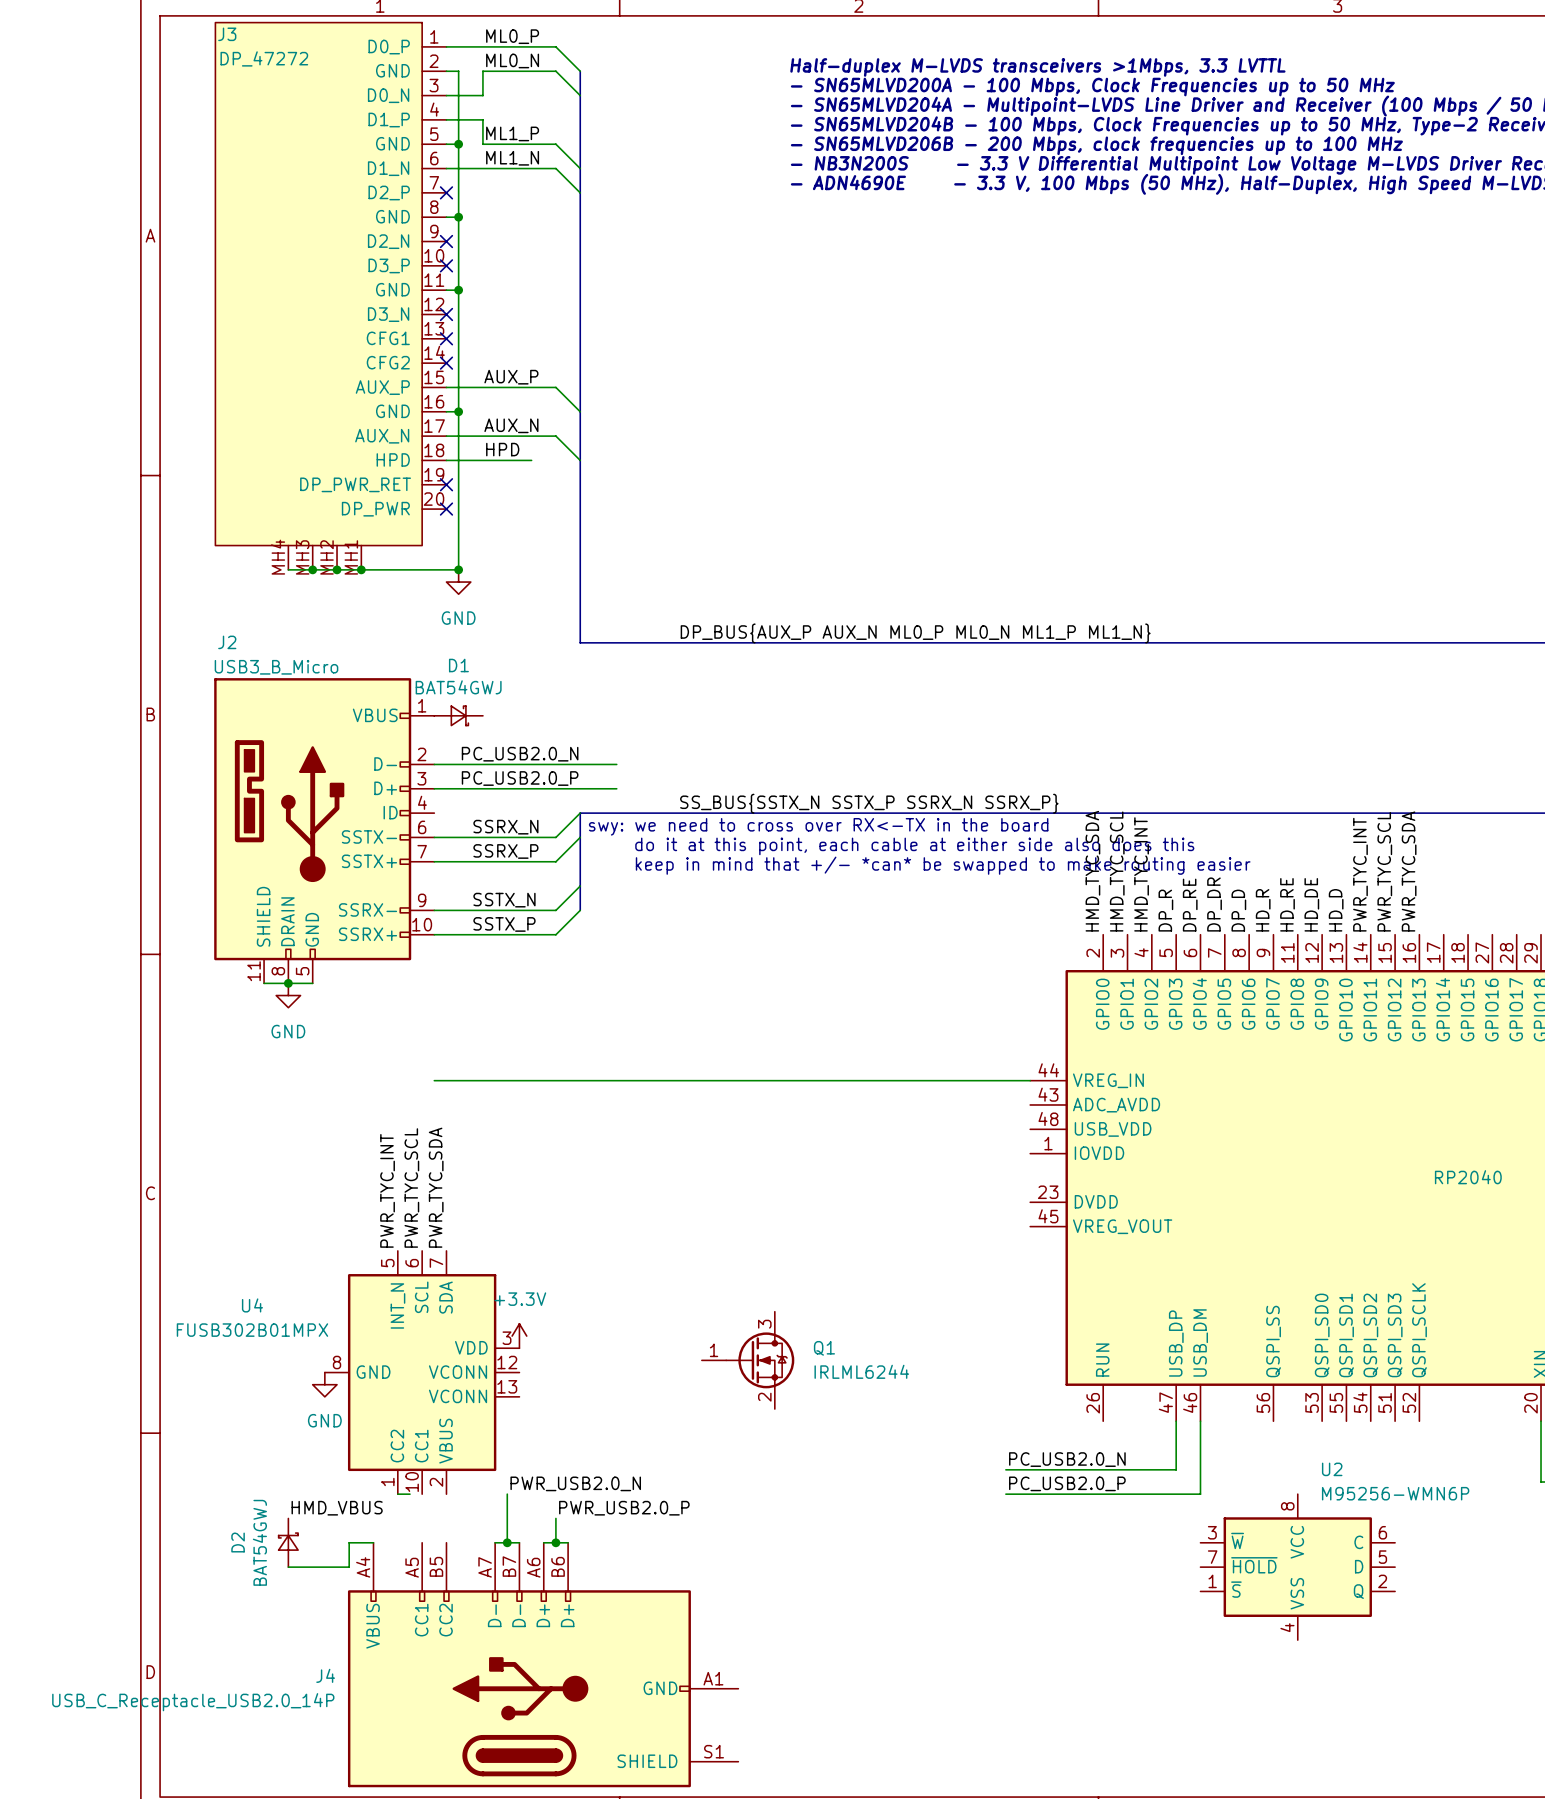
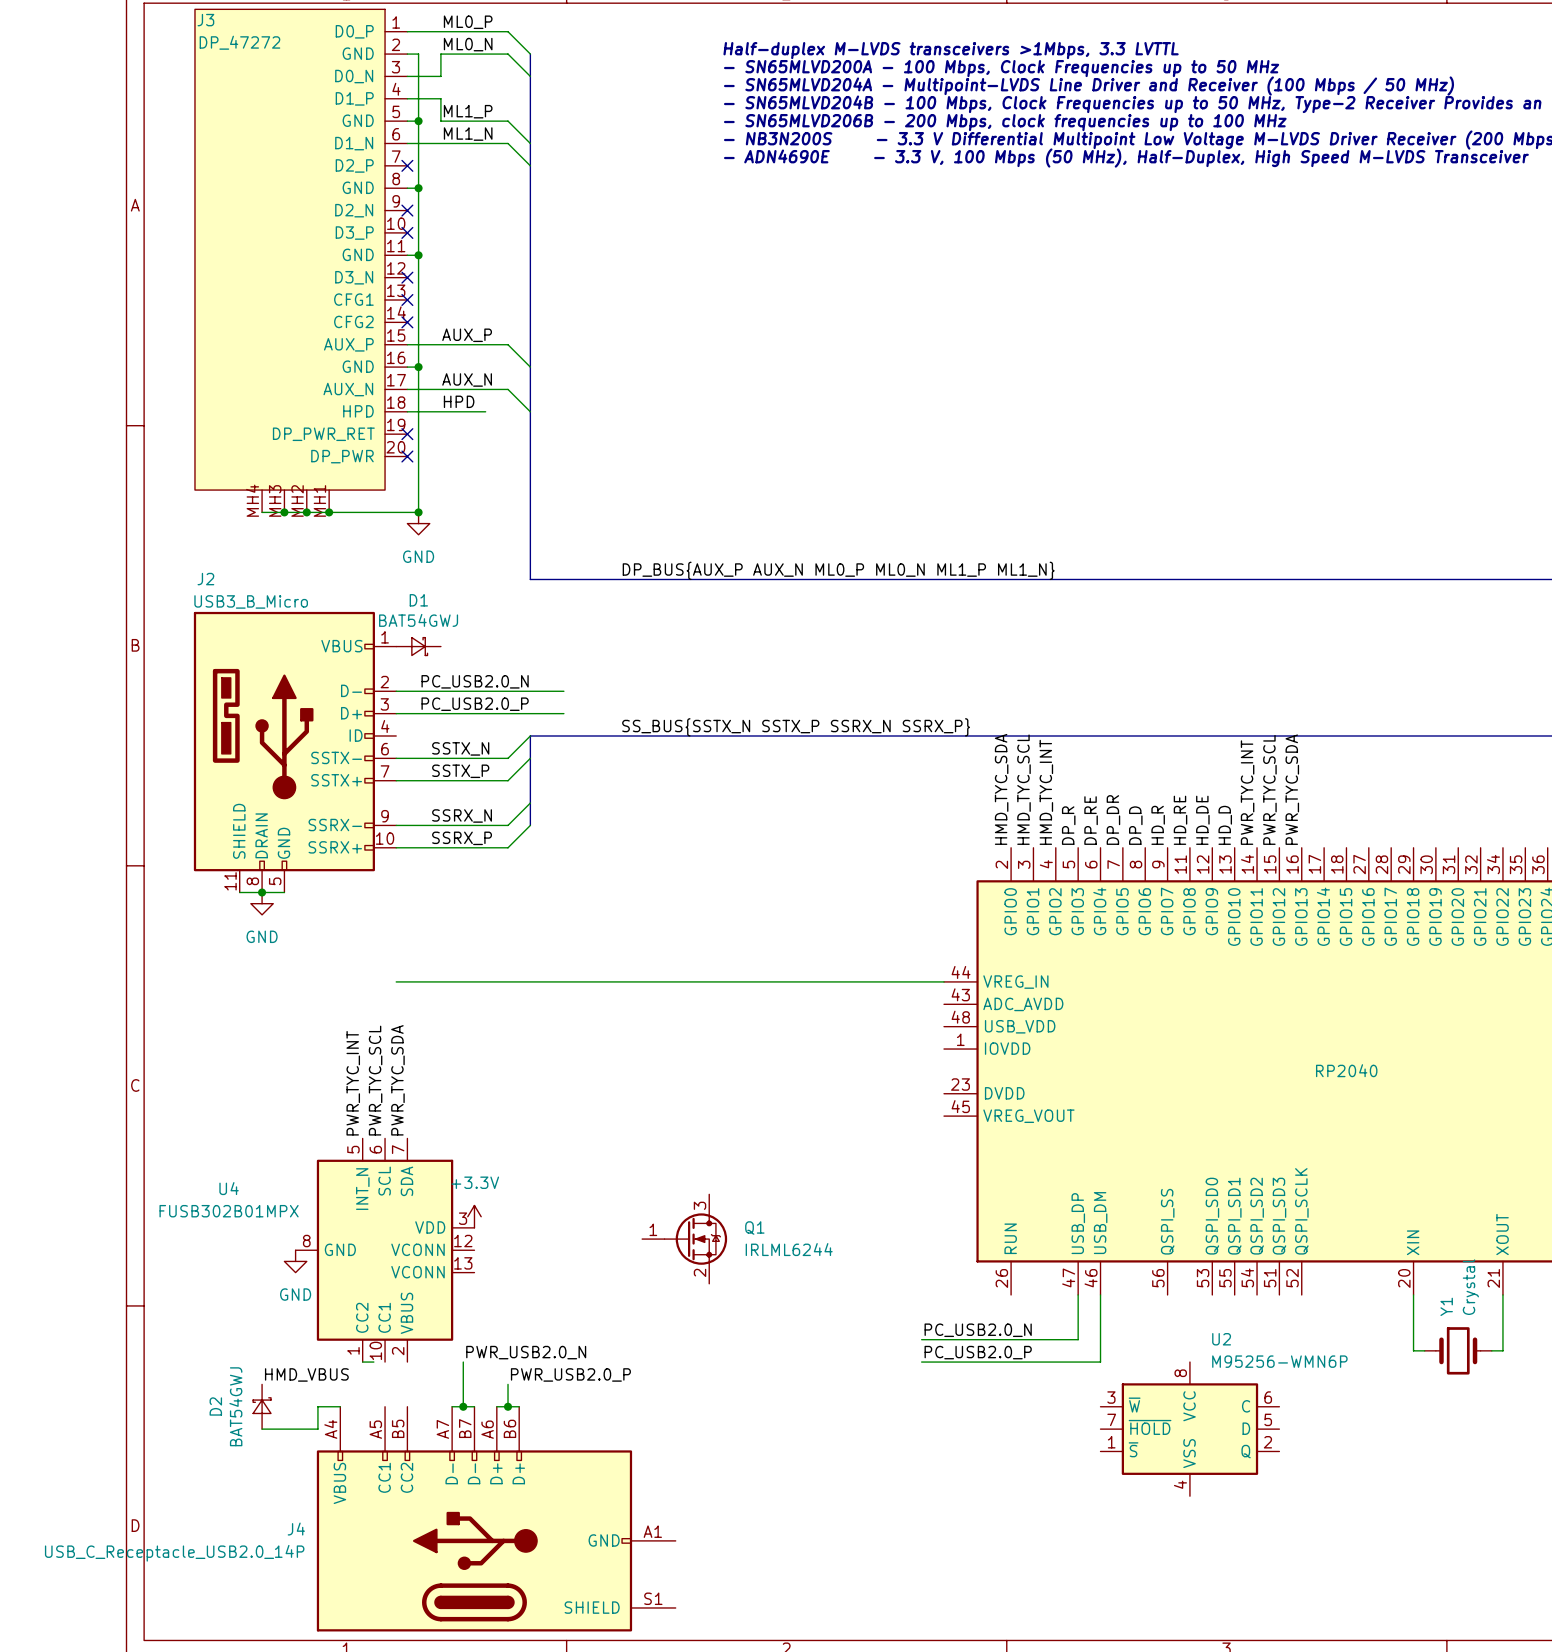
text: swy: we need to cross over RX<-TX in the board (818, 826) -> none
label: SSRX_N (505, 827) -> SSTX_N (460, 748)
text: do it at this point, each cable at either side also does this (914, 846) -> none
label: SSRX_P (505, 851) -> SSTX_P (460, 771)
text: keep in mind that +/- *can* be swapped to make routing easier (943, 865) -> none
label: SSTX_N (504, 900) -> SSRX_N (462, 815)
label: SSTX_P (504, 924) -> SSRX_P (462, 838)

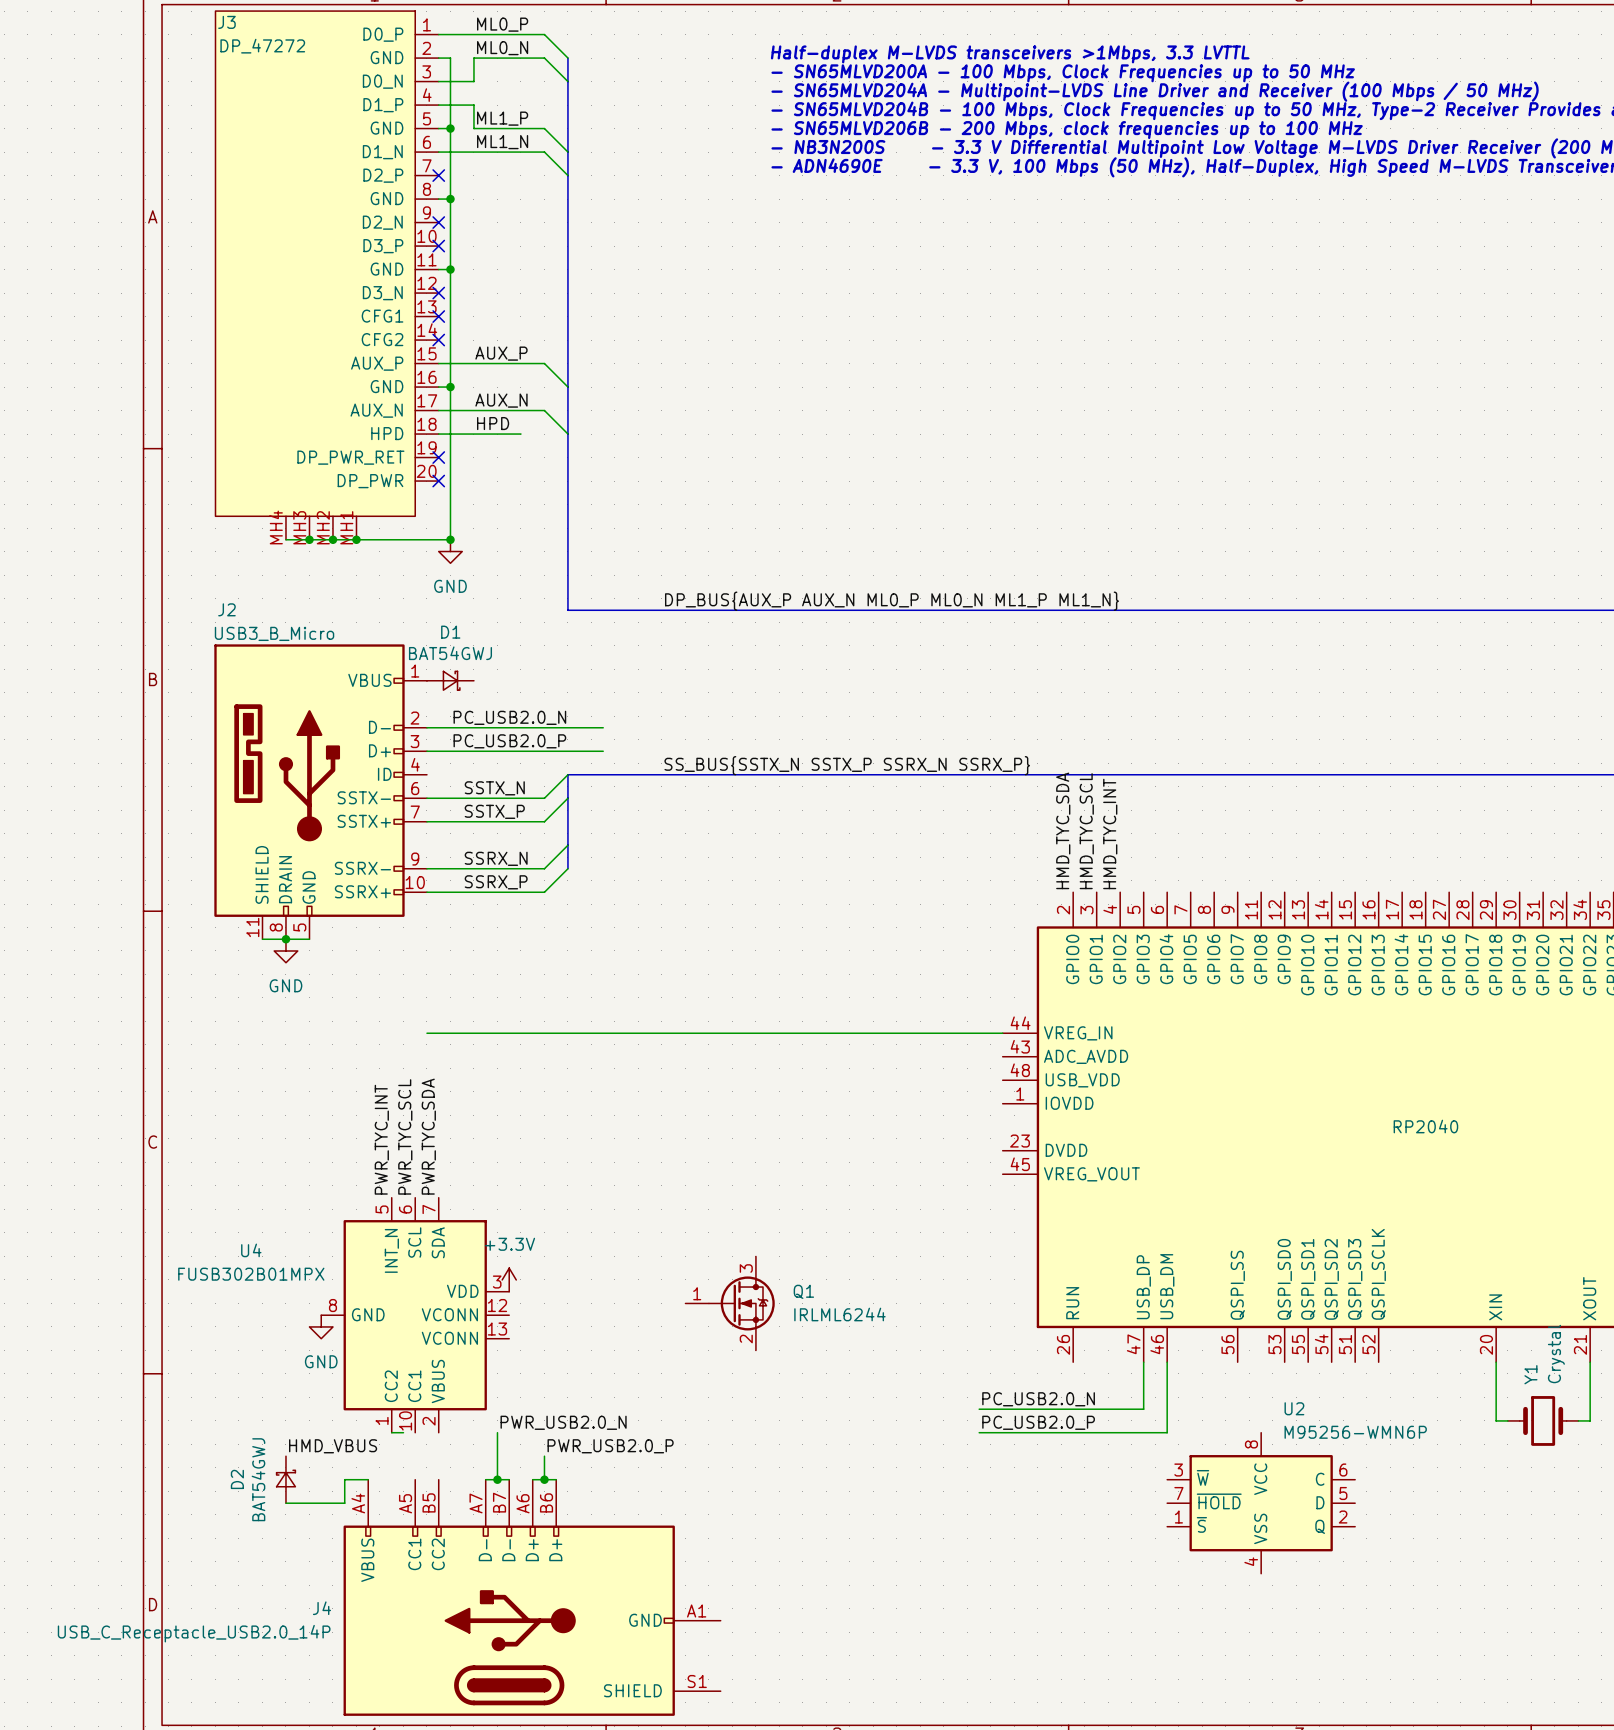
label: PWR_TYC_SCL (1269, 789) -> none
label: PWR_TYC_SDA (1292, 789) -> none
label: PWR_TYC_INT (1247, 792) -> none
label: DP_RE (1091, 820) -> none
label: DP_DR (1113, 820) -> none
label: HD_RE (1180, 820) -> none
label: HD_DE (1202, 820) -> none
label: DP_R (1068, 825) -> none
label: DP_D (1135, 825) -> none
label: HD_R (1158, 825) -> none
label: HD_D (1225, 825) -> none

